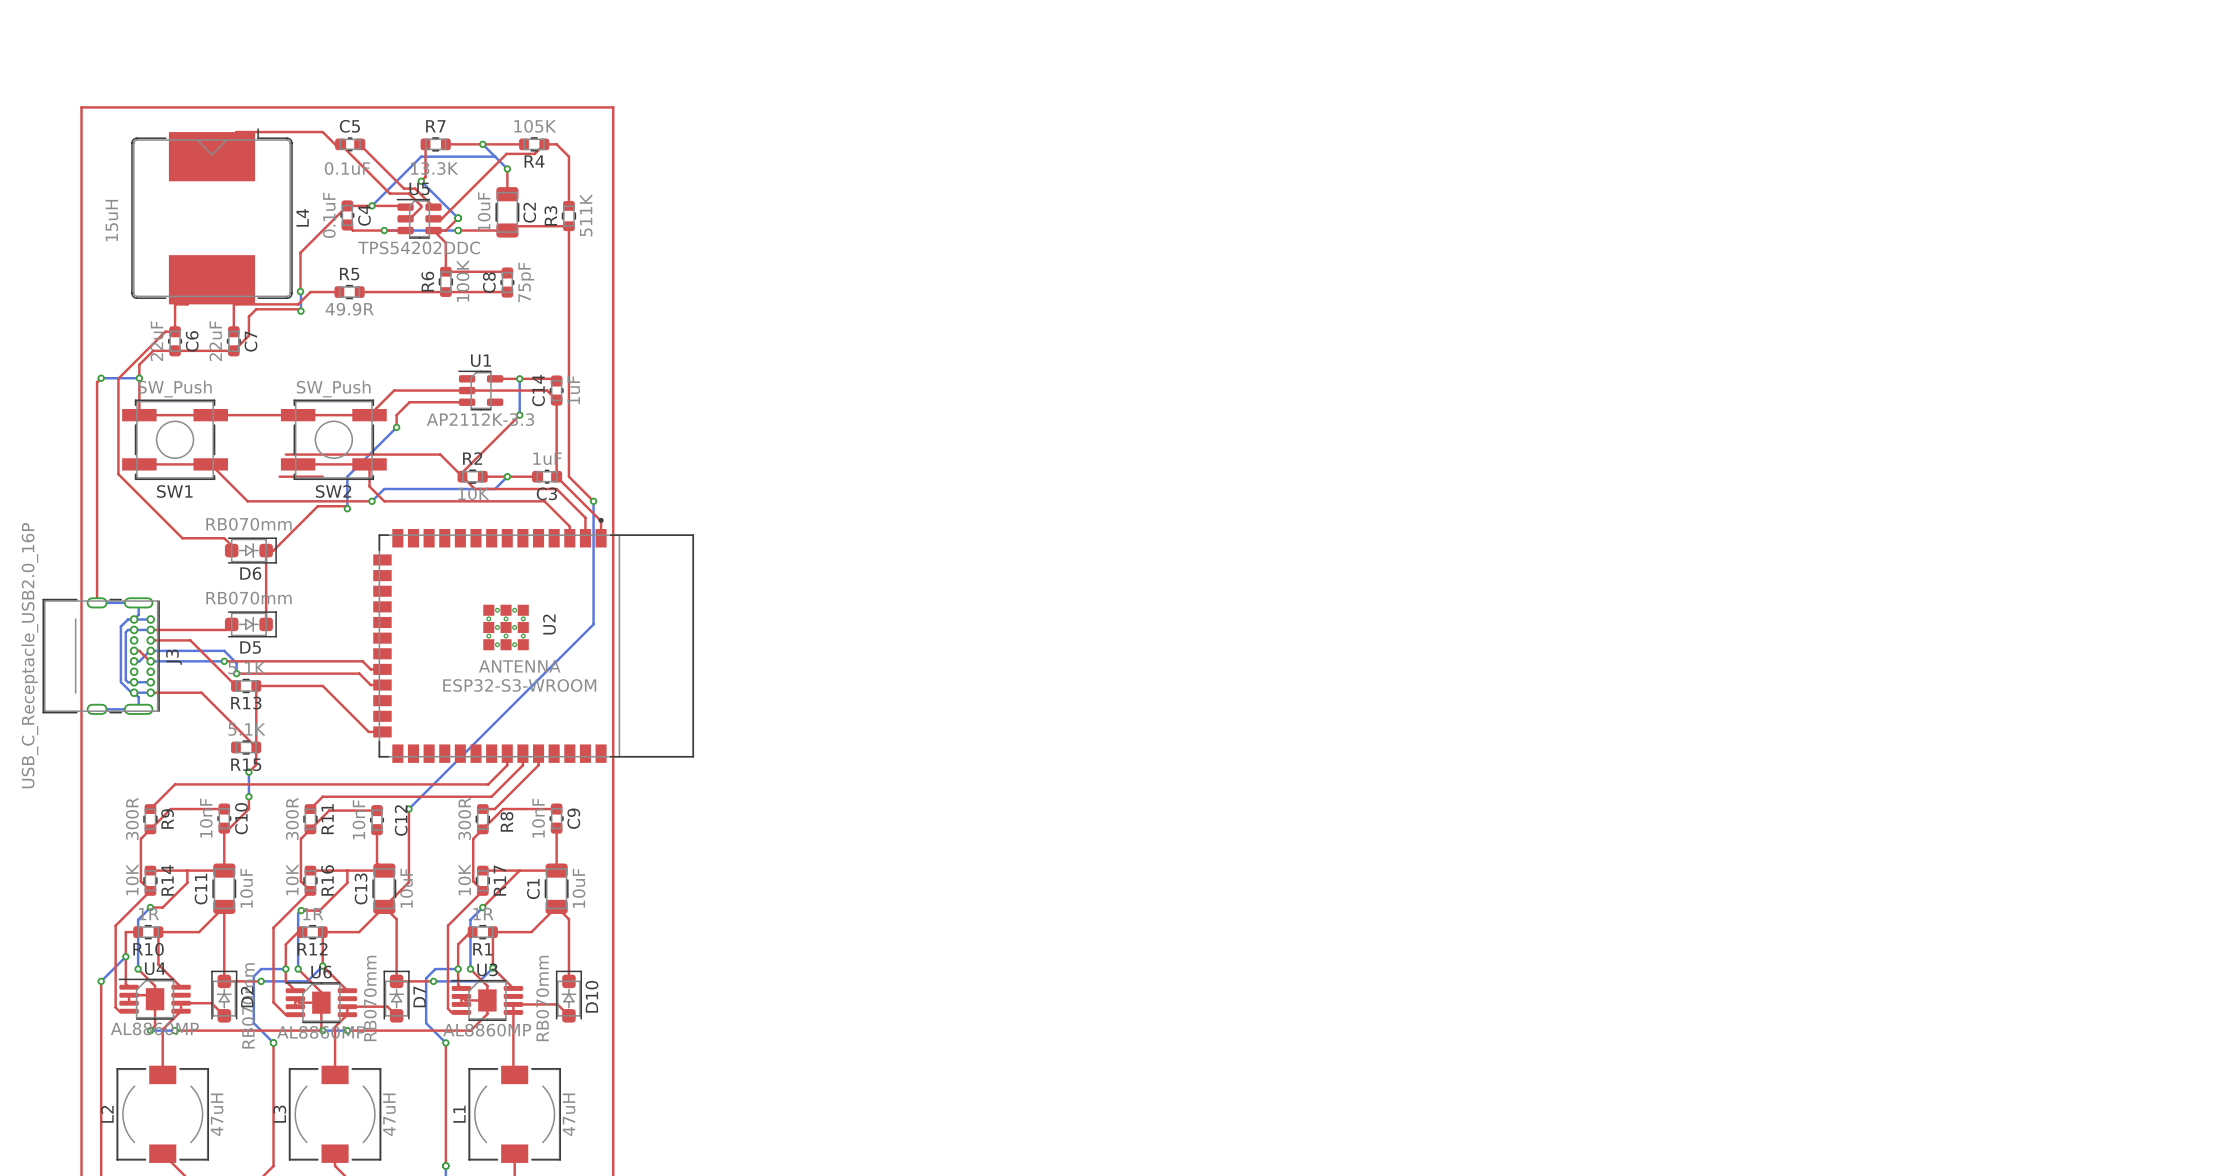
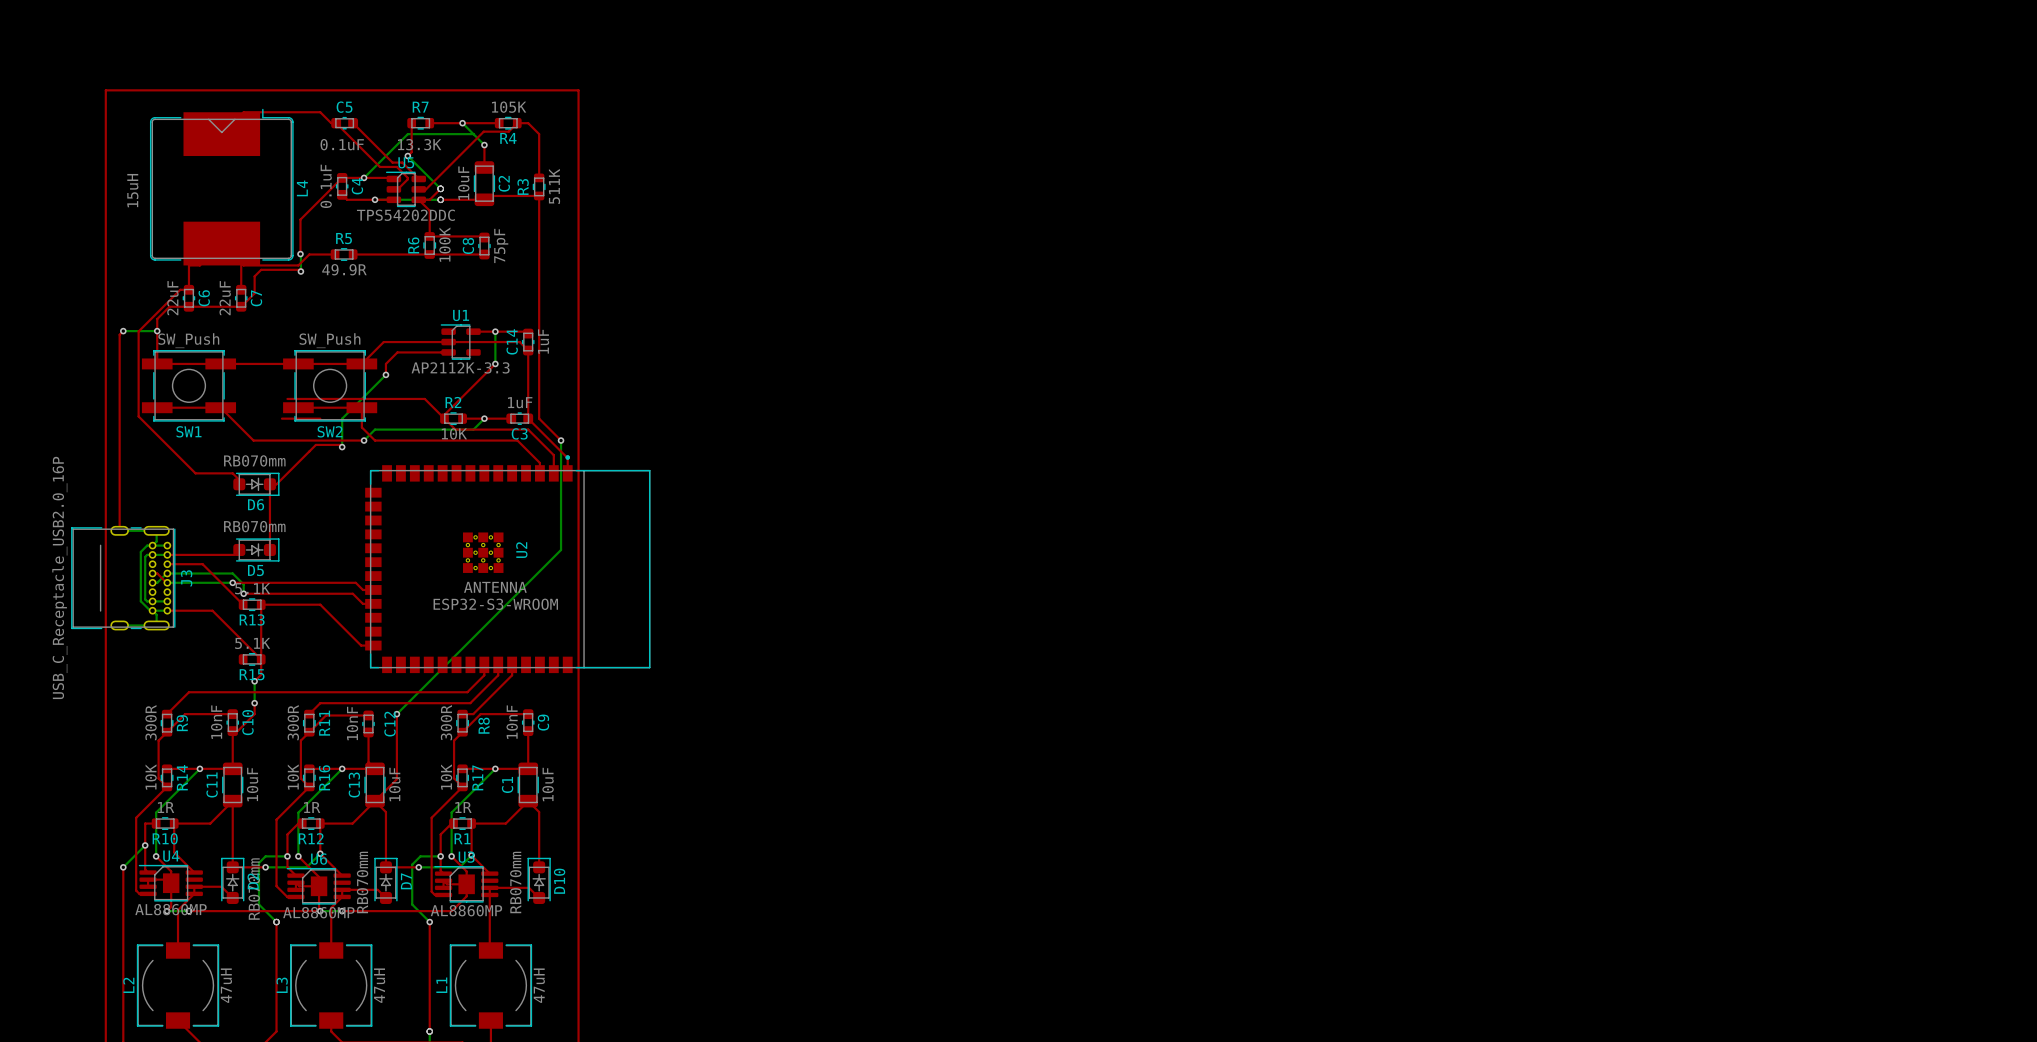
top track: (187, 870) (187, 882) (162, 907) (150, 907) -> none
bottom track: none -> (199, 768) (167, 801)
top track: (347, 870) (347, 882) (319, 910) (301, 910) -> none
via: none -> (342, 768)
top track: (519, 870) (482, 907) -> none
bottom track: none -> (495, 768) (462, 801)
via position: (150, 907) -> (199, 768)
via position: (482, 907) -> (495, 768)
bottom track: (301, 910) (298, 913) (298, 919) -> (342, 768) (298, 812)
via: (301, 910) -> none

